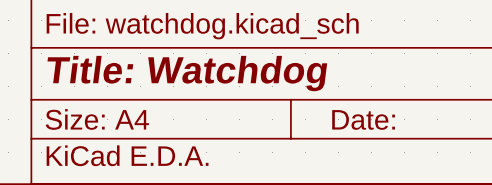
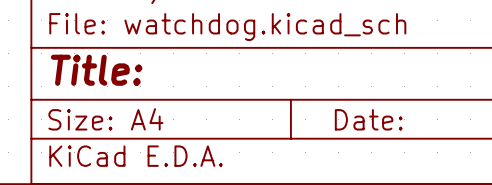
title block: Title: Watchdog (187, 73) -> Title: (96, 70)

